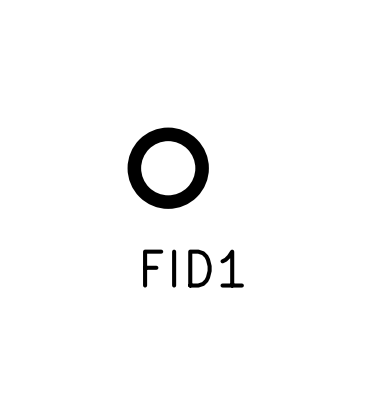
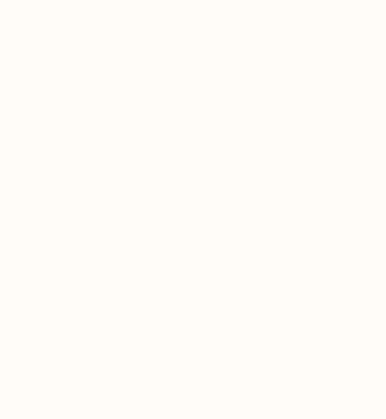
FID1: (168, 168) -> none

